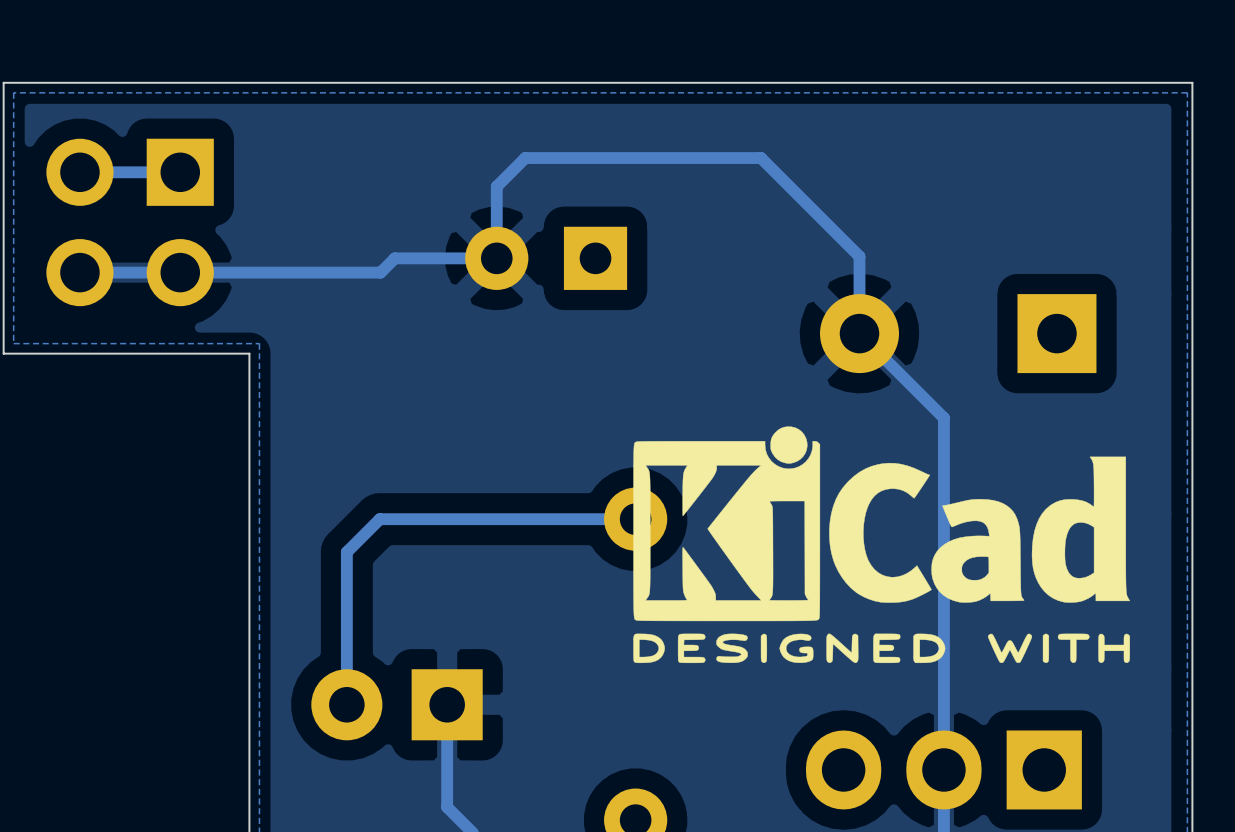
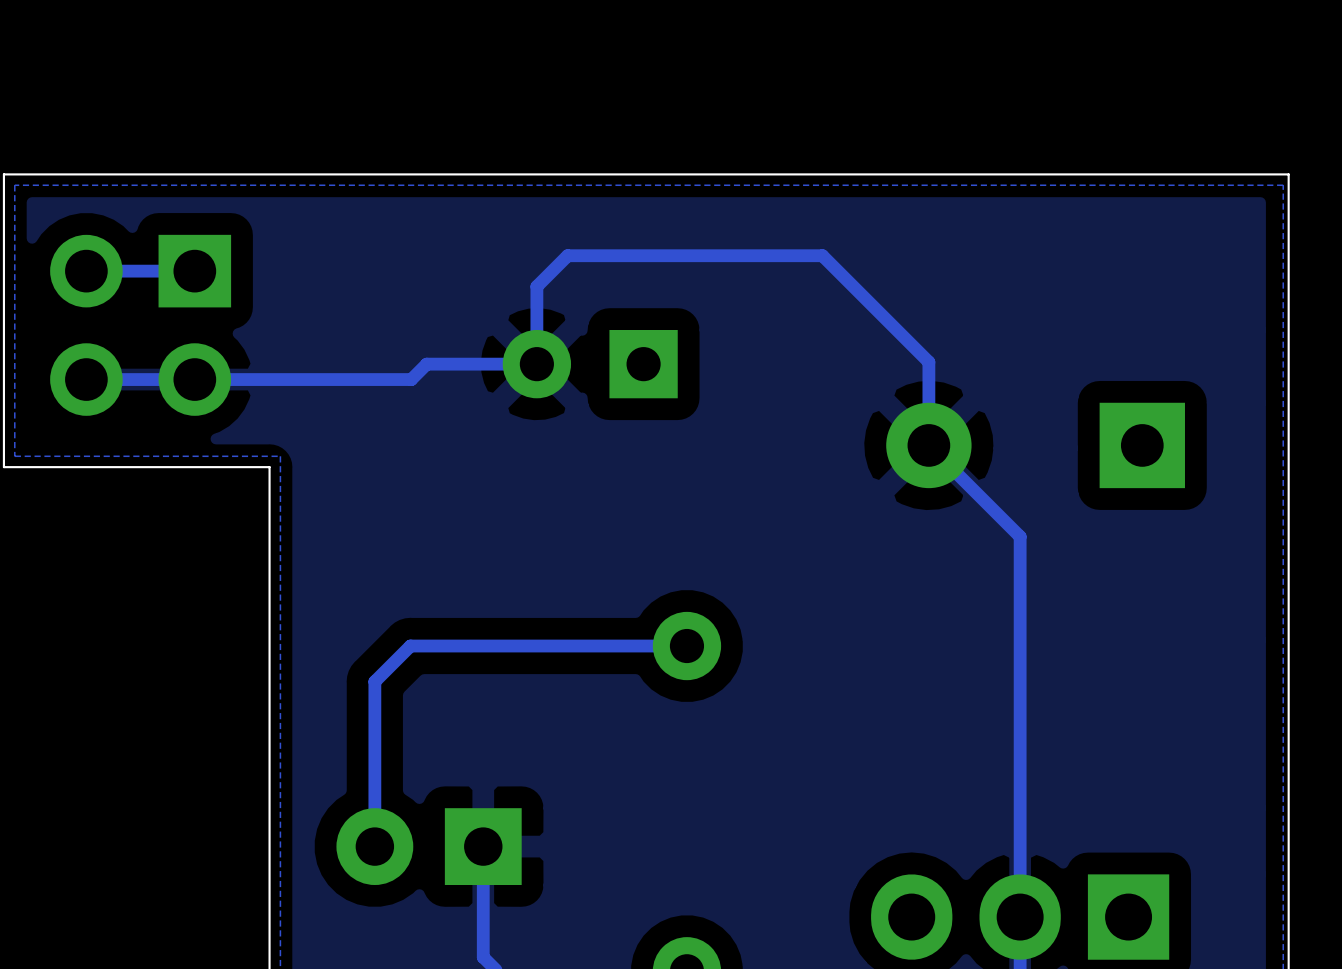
drawing: [633, 426, 1130, 664] -> none

